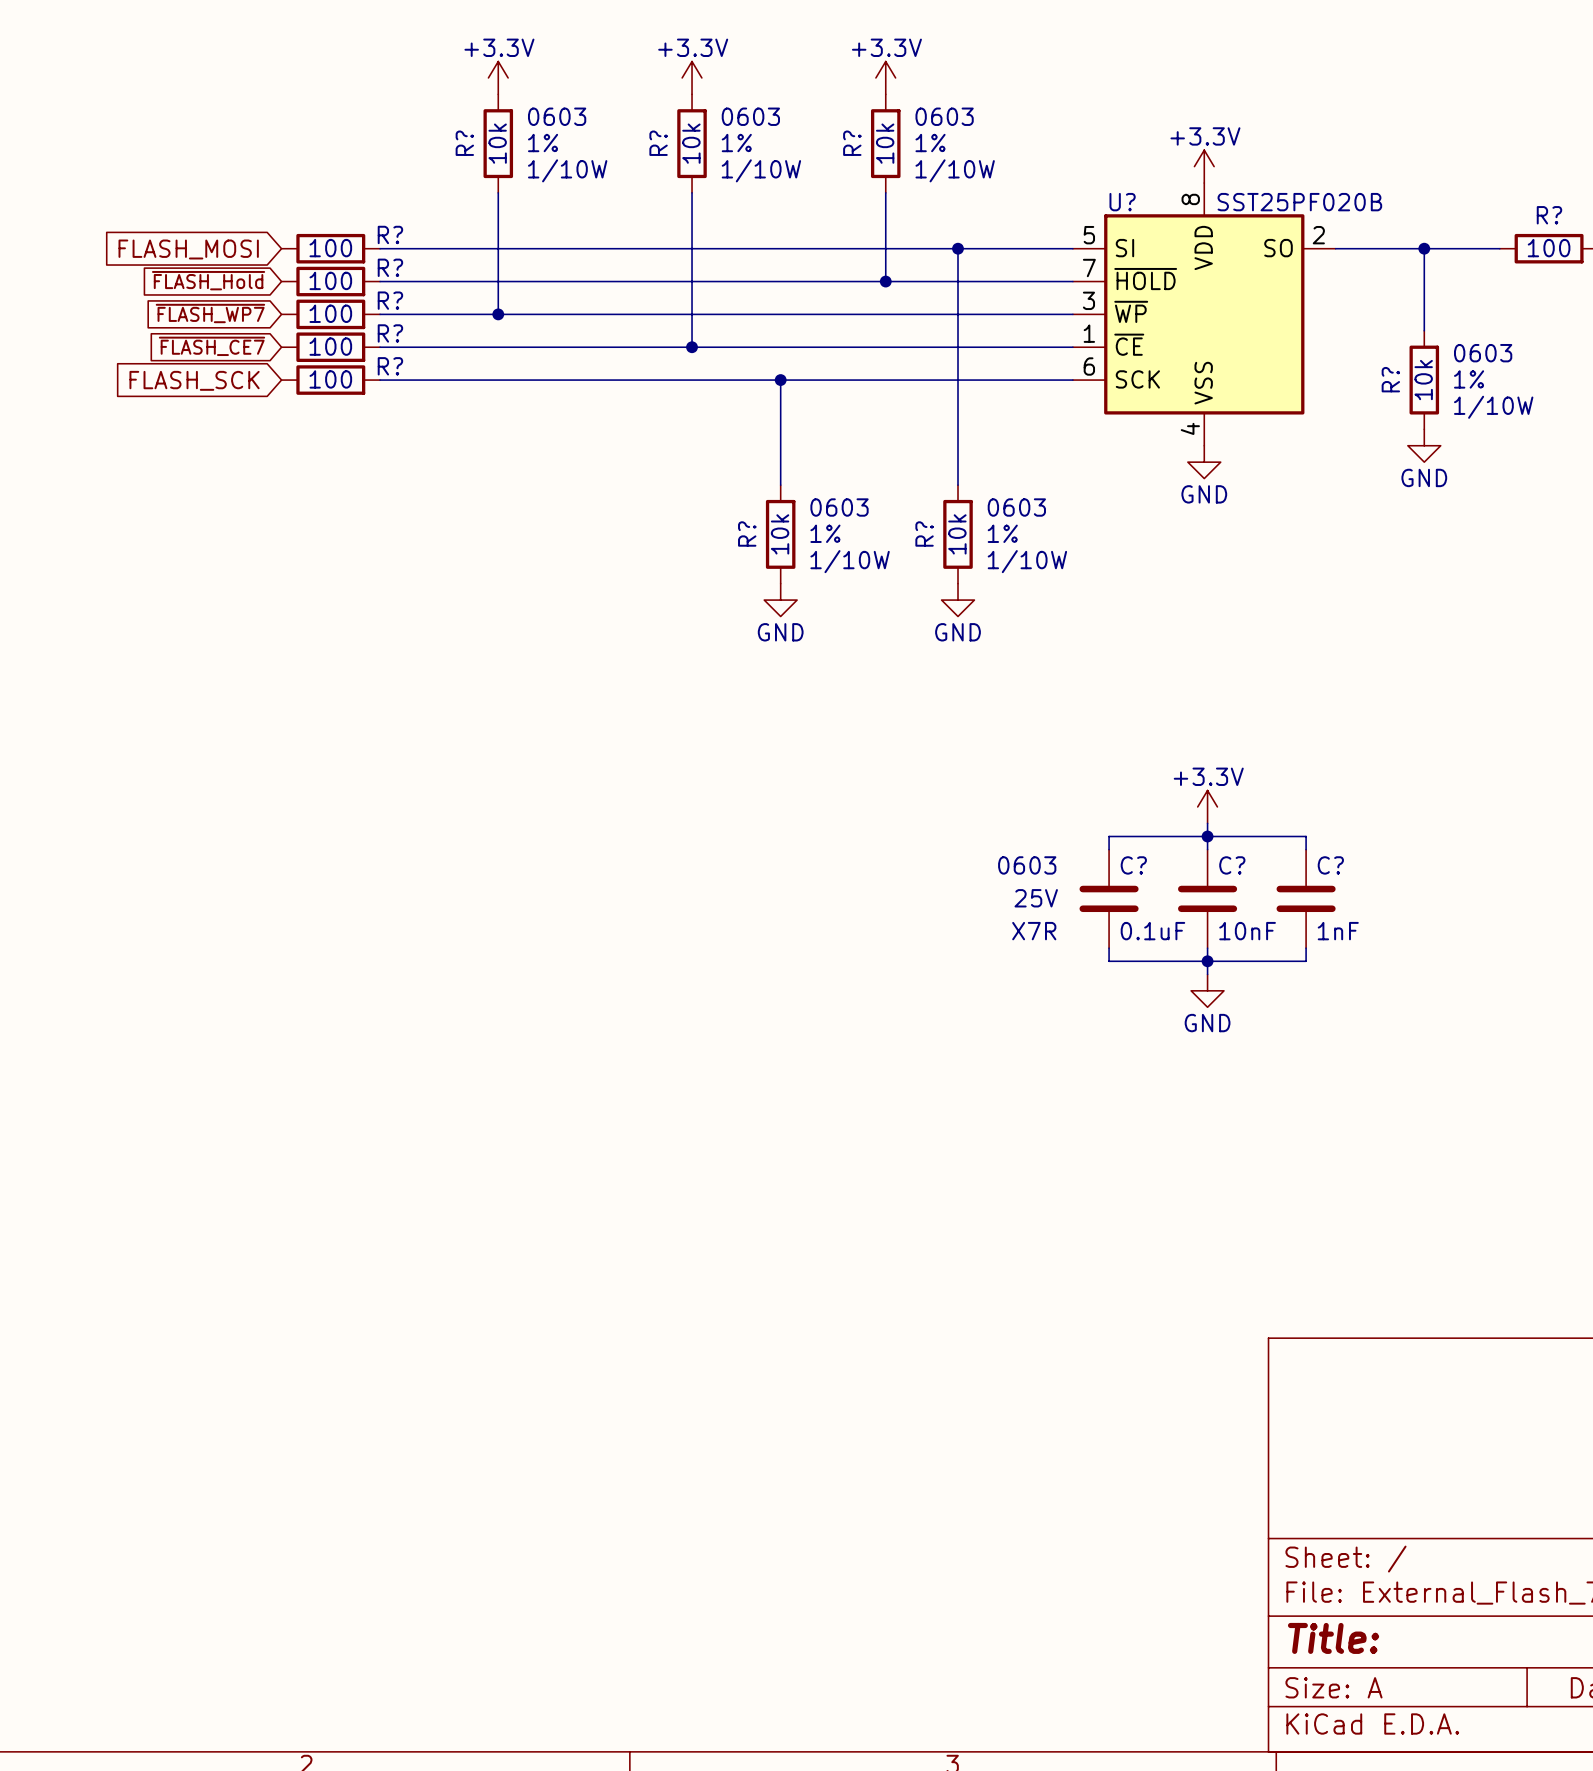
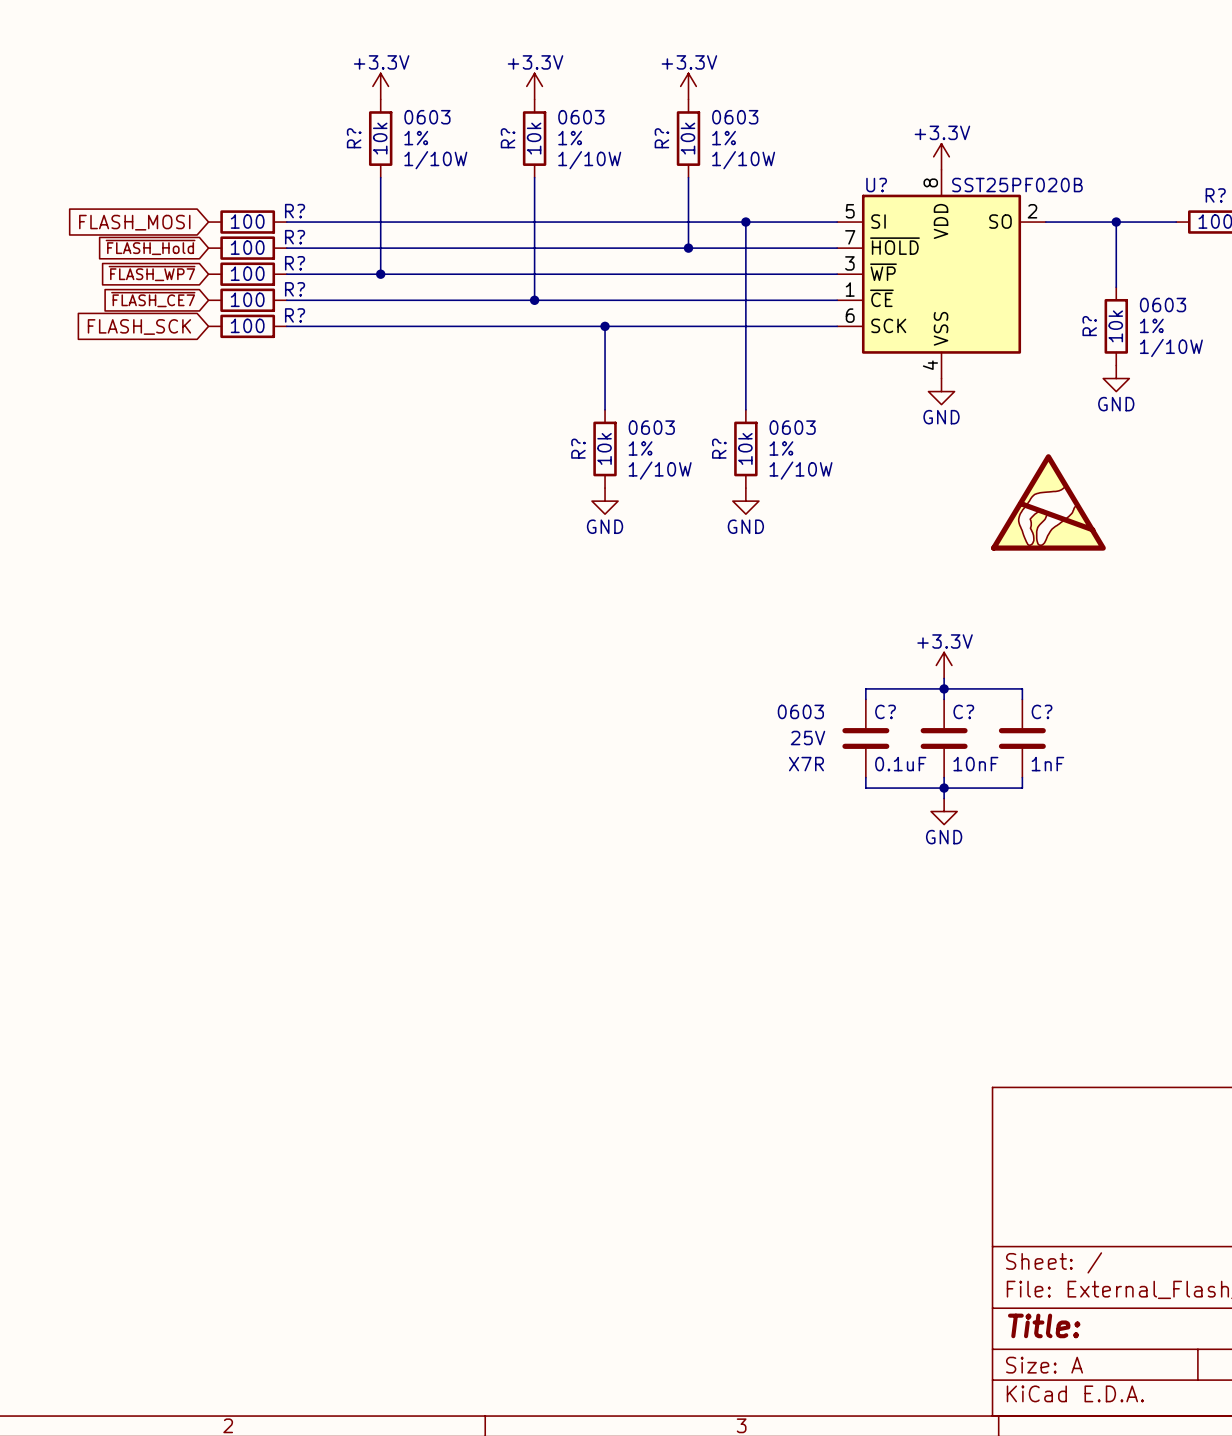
power symbol: none -> (1048, 502)

